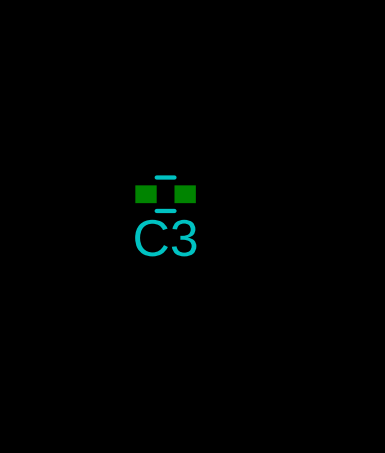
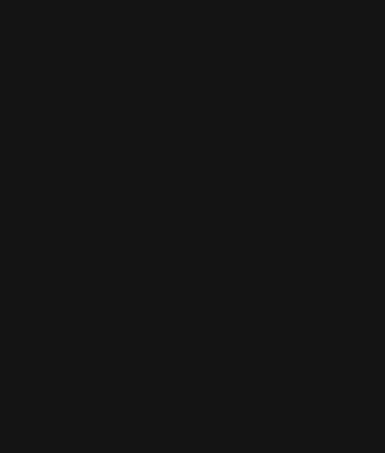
C3: (165, 194) -> none

